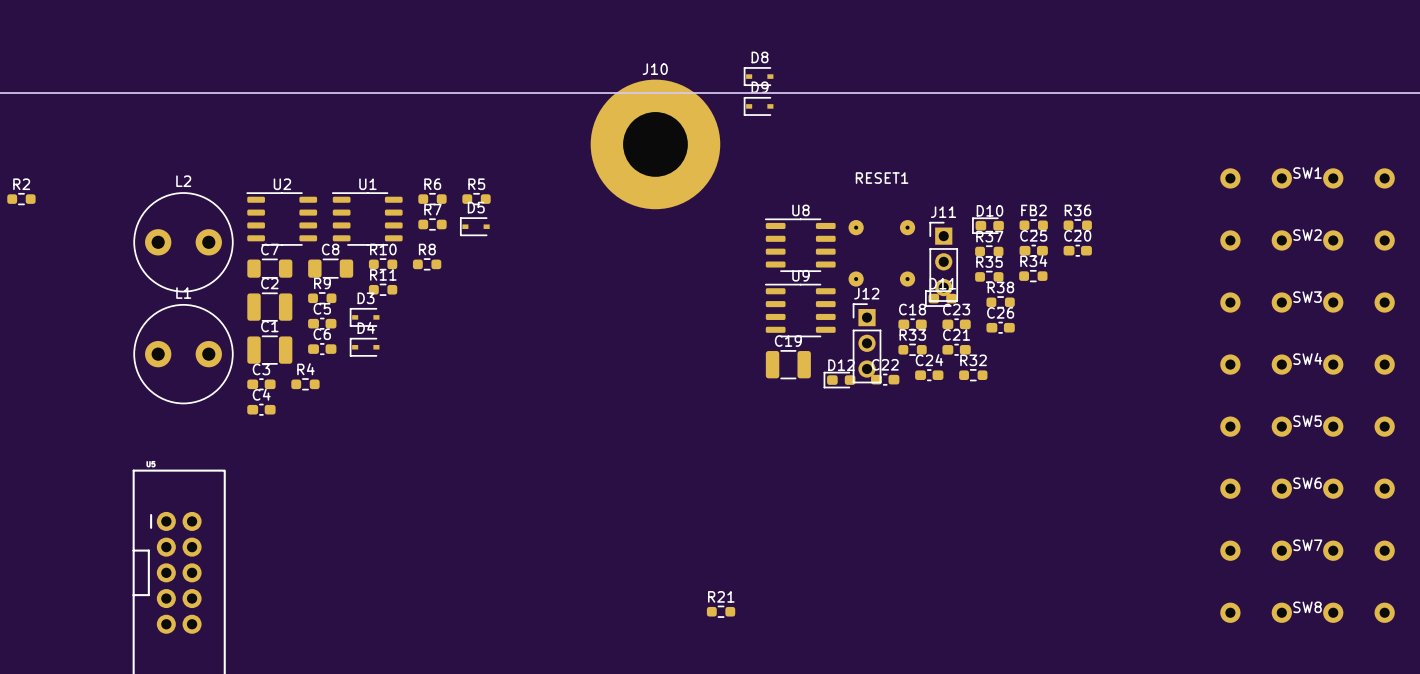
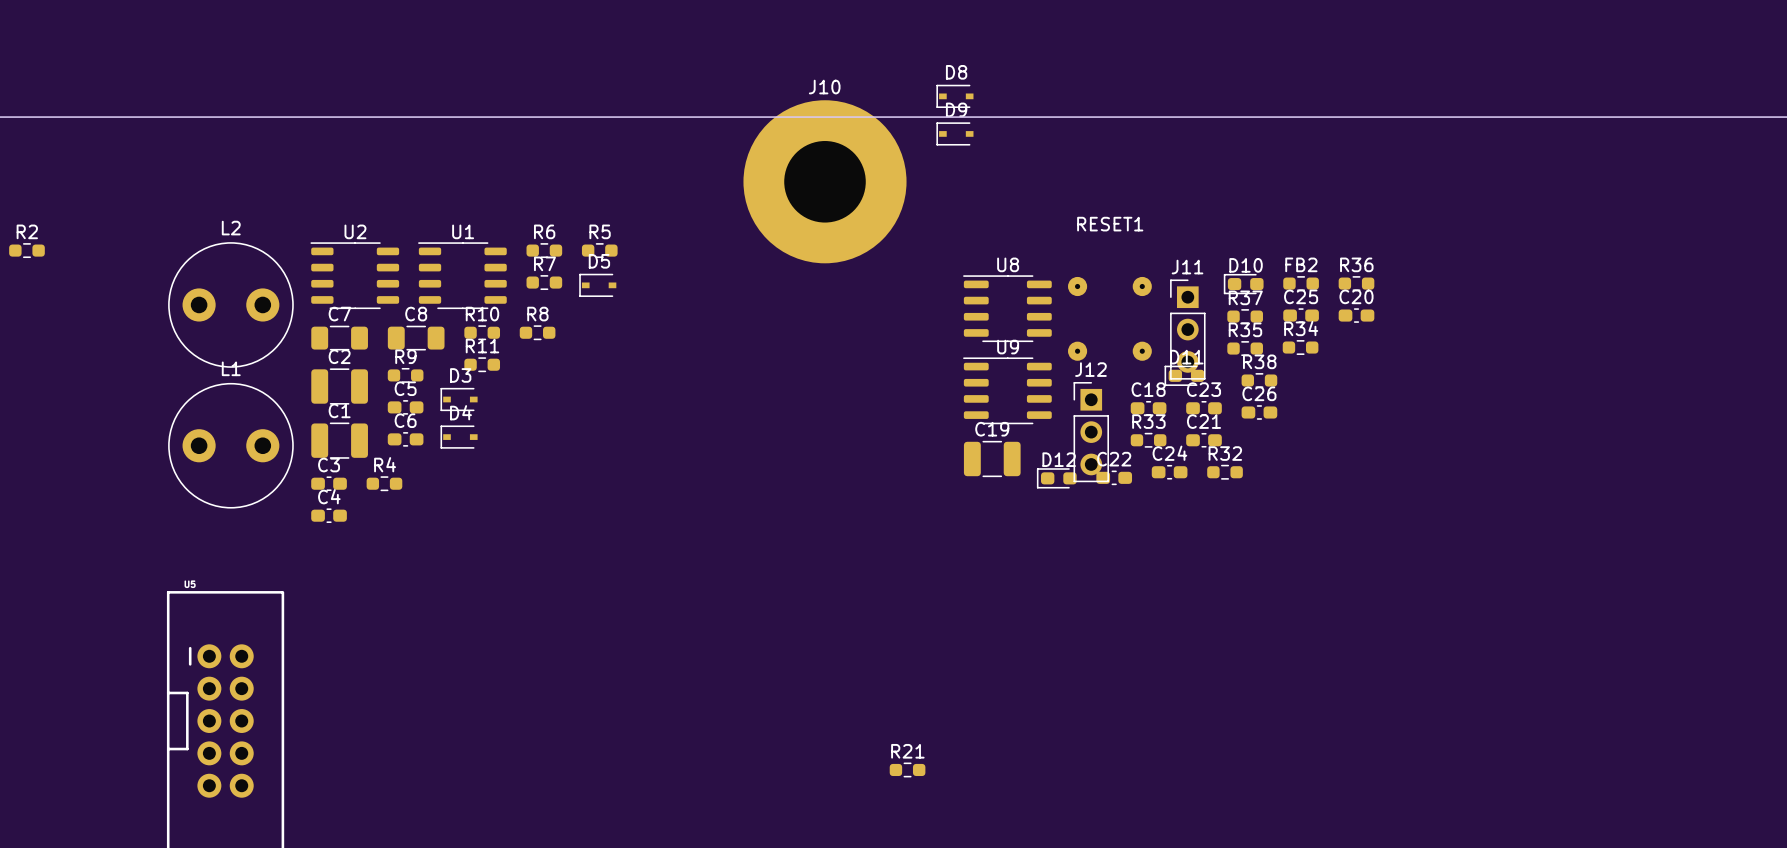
SW1: (1307, 178) -> none
SW2: (1307, 240) -> none
SW3: (1307, 302) -> none
SW4: (1307, 364) -> none
SW5: (1307, 426) -> none
SW6: (1307, 488) -> none
SW7: (1307, 550) -> none
SW8: (1307, 612) -> none

